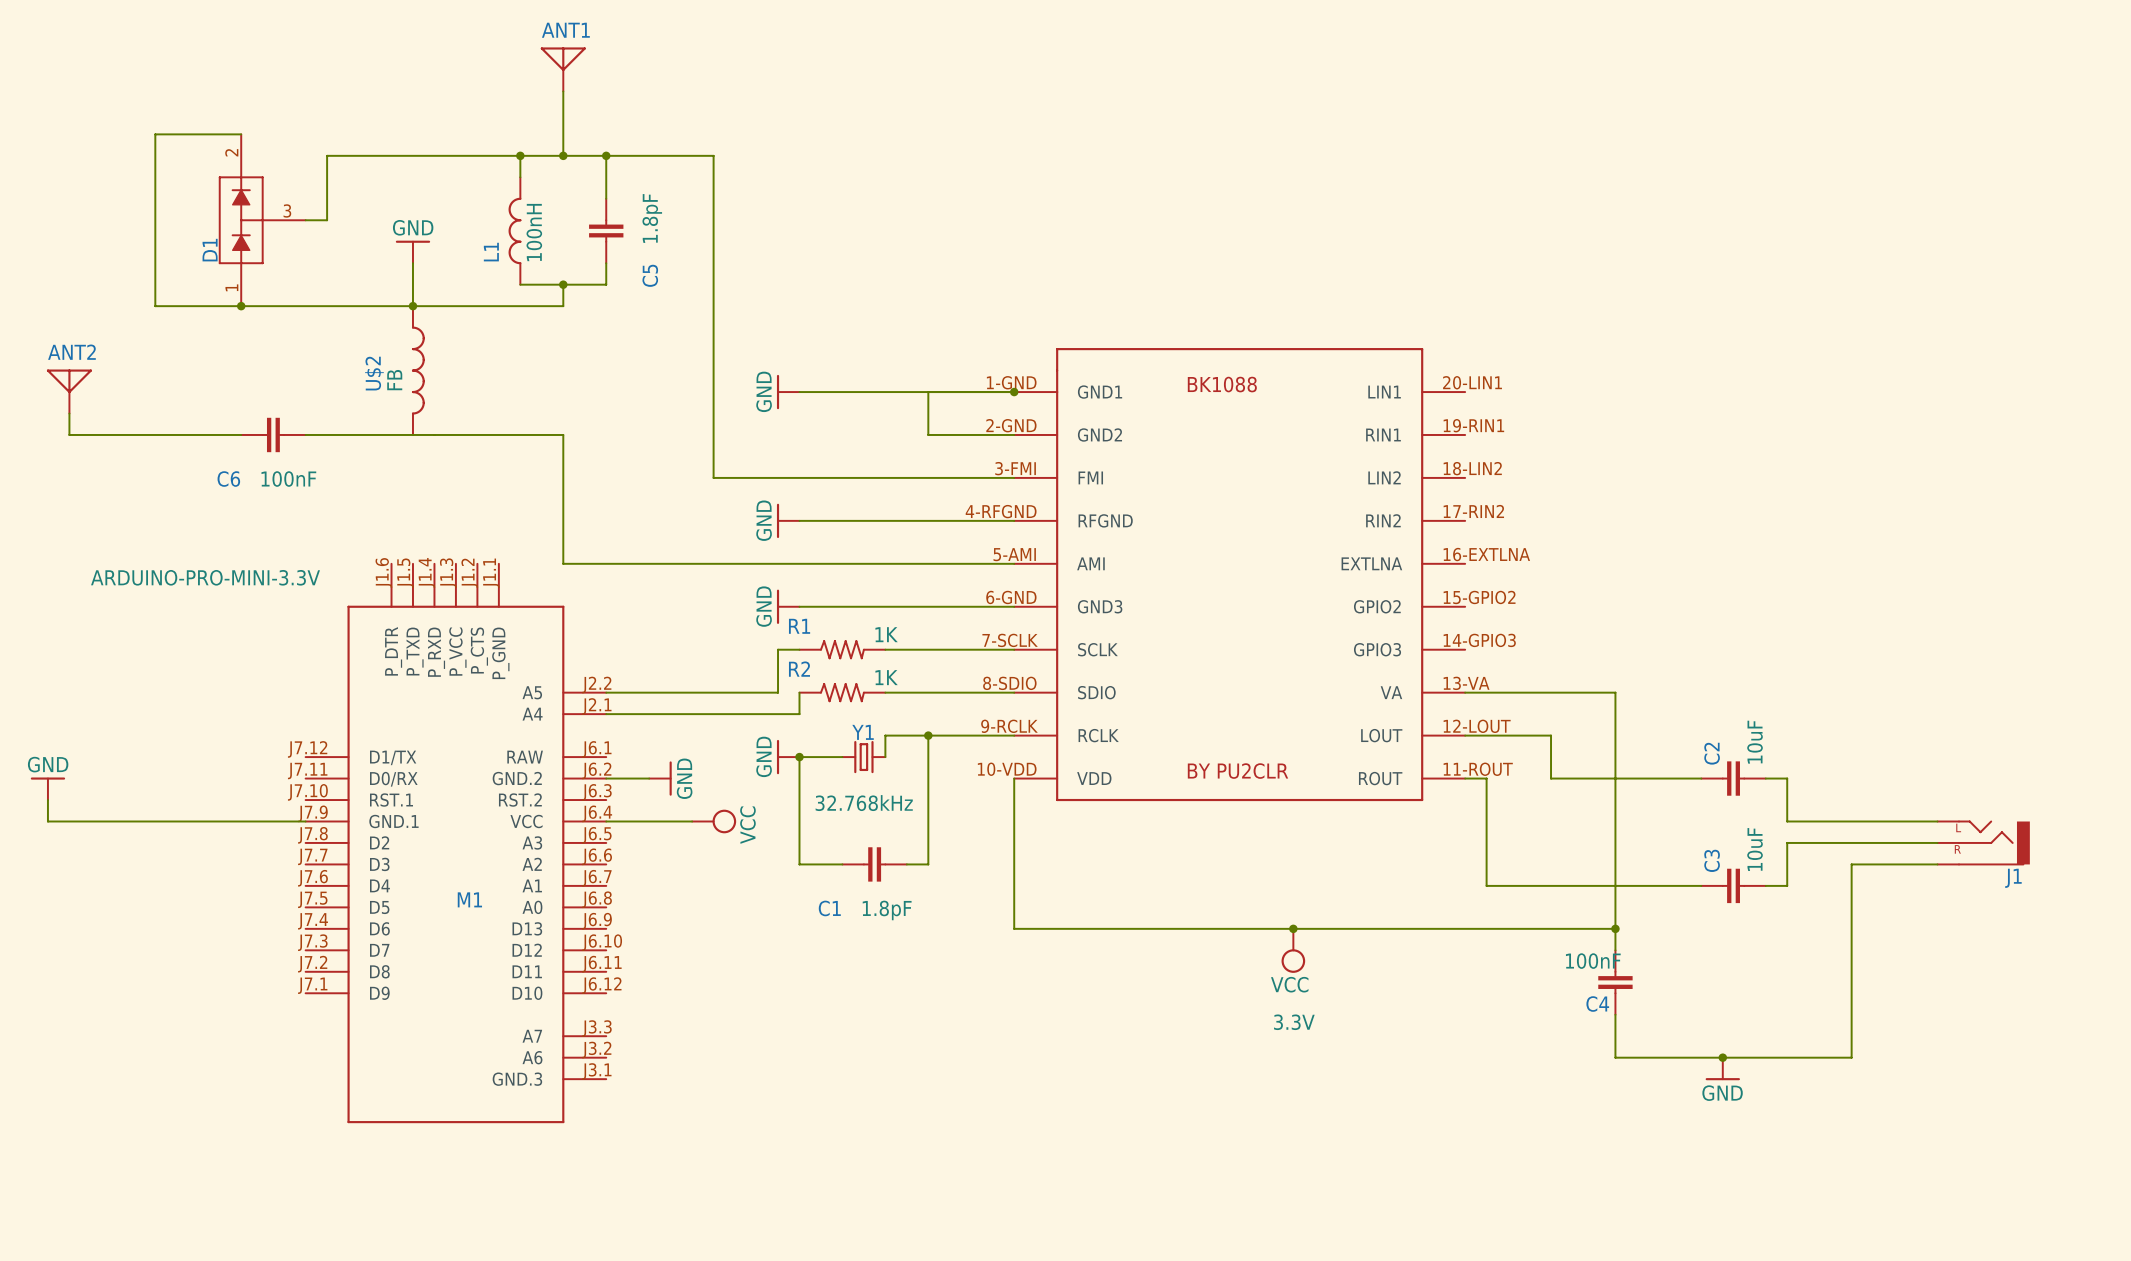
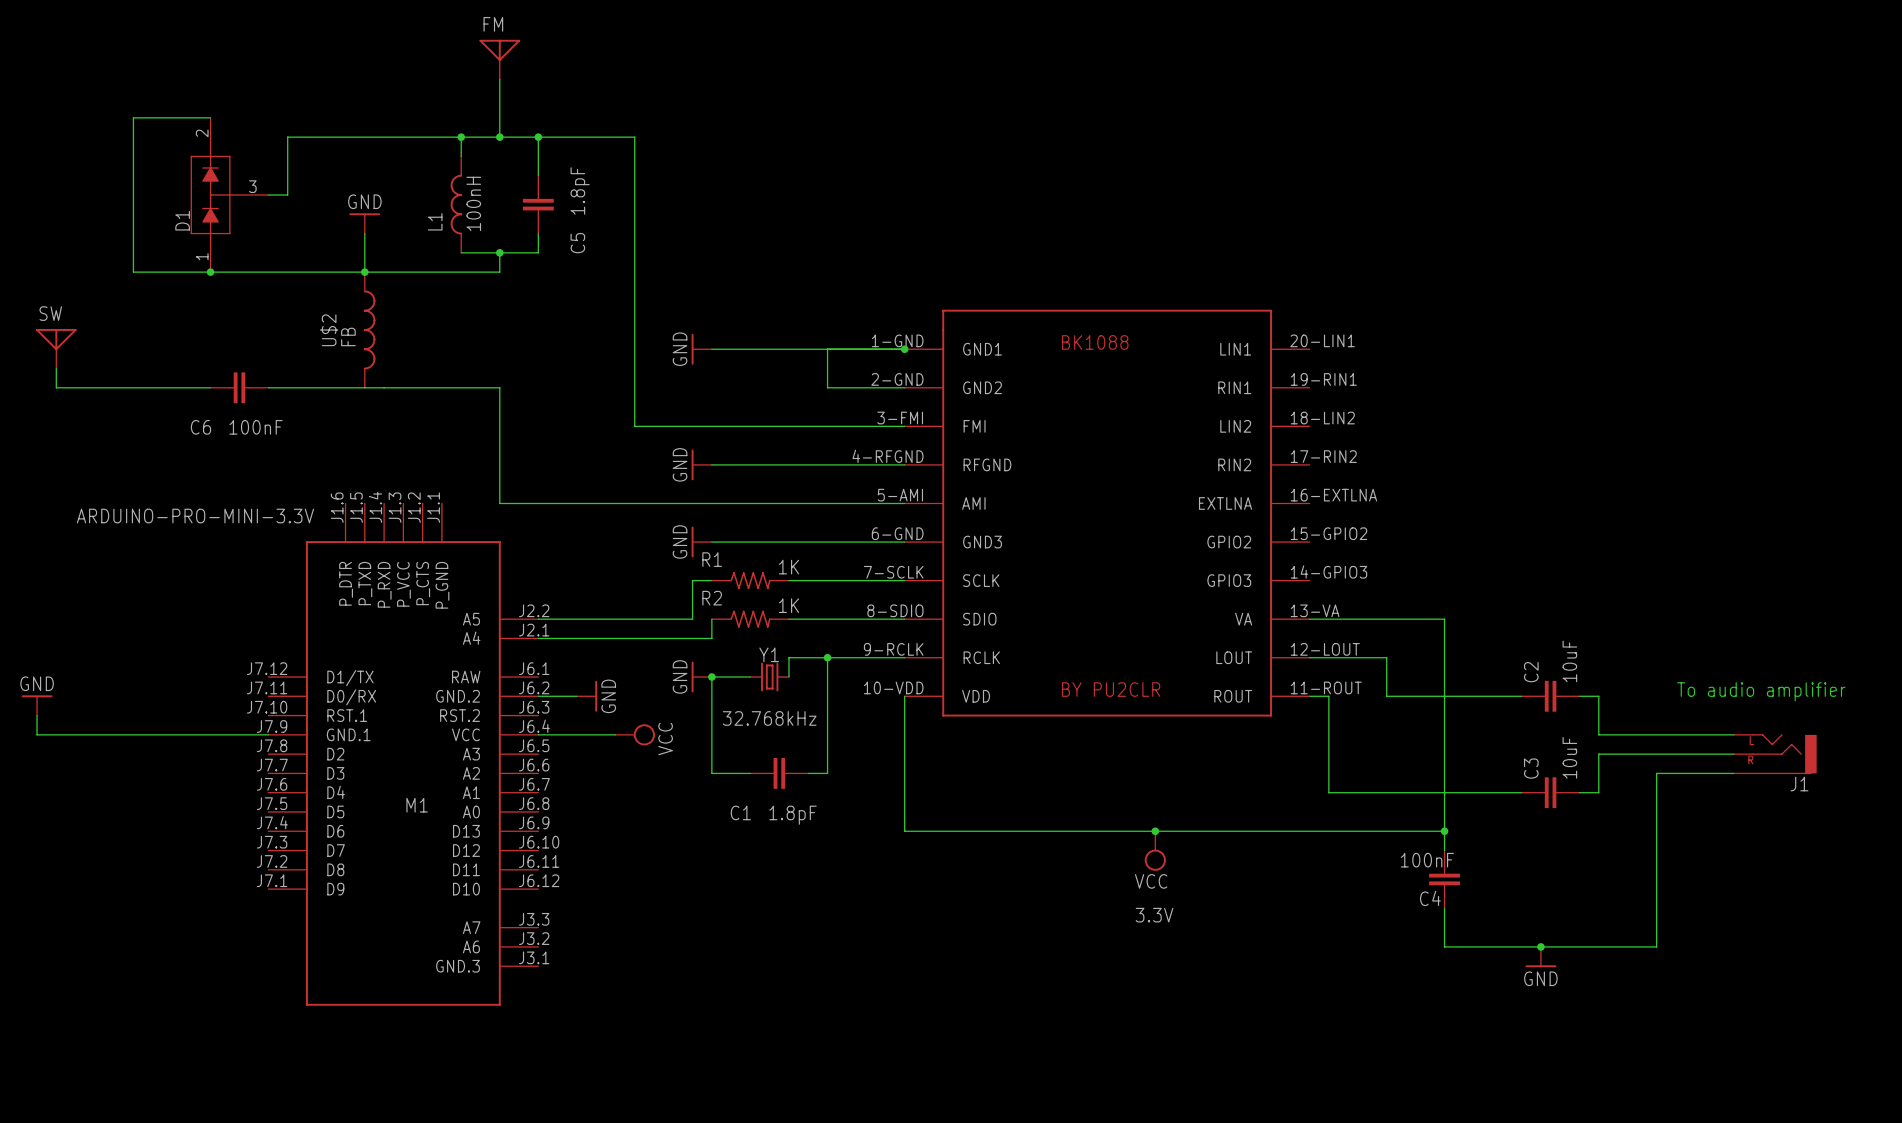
ANT1 name: ANT1 (565, 30) -> FM (493, 24)
ANT2 name: ANT2 (71, 352) -> SW (50, 313)
text: none -> To audio amplifier (1761, 691)

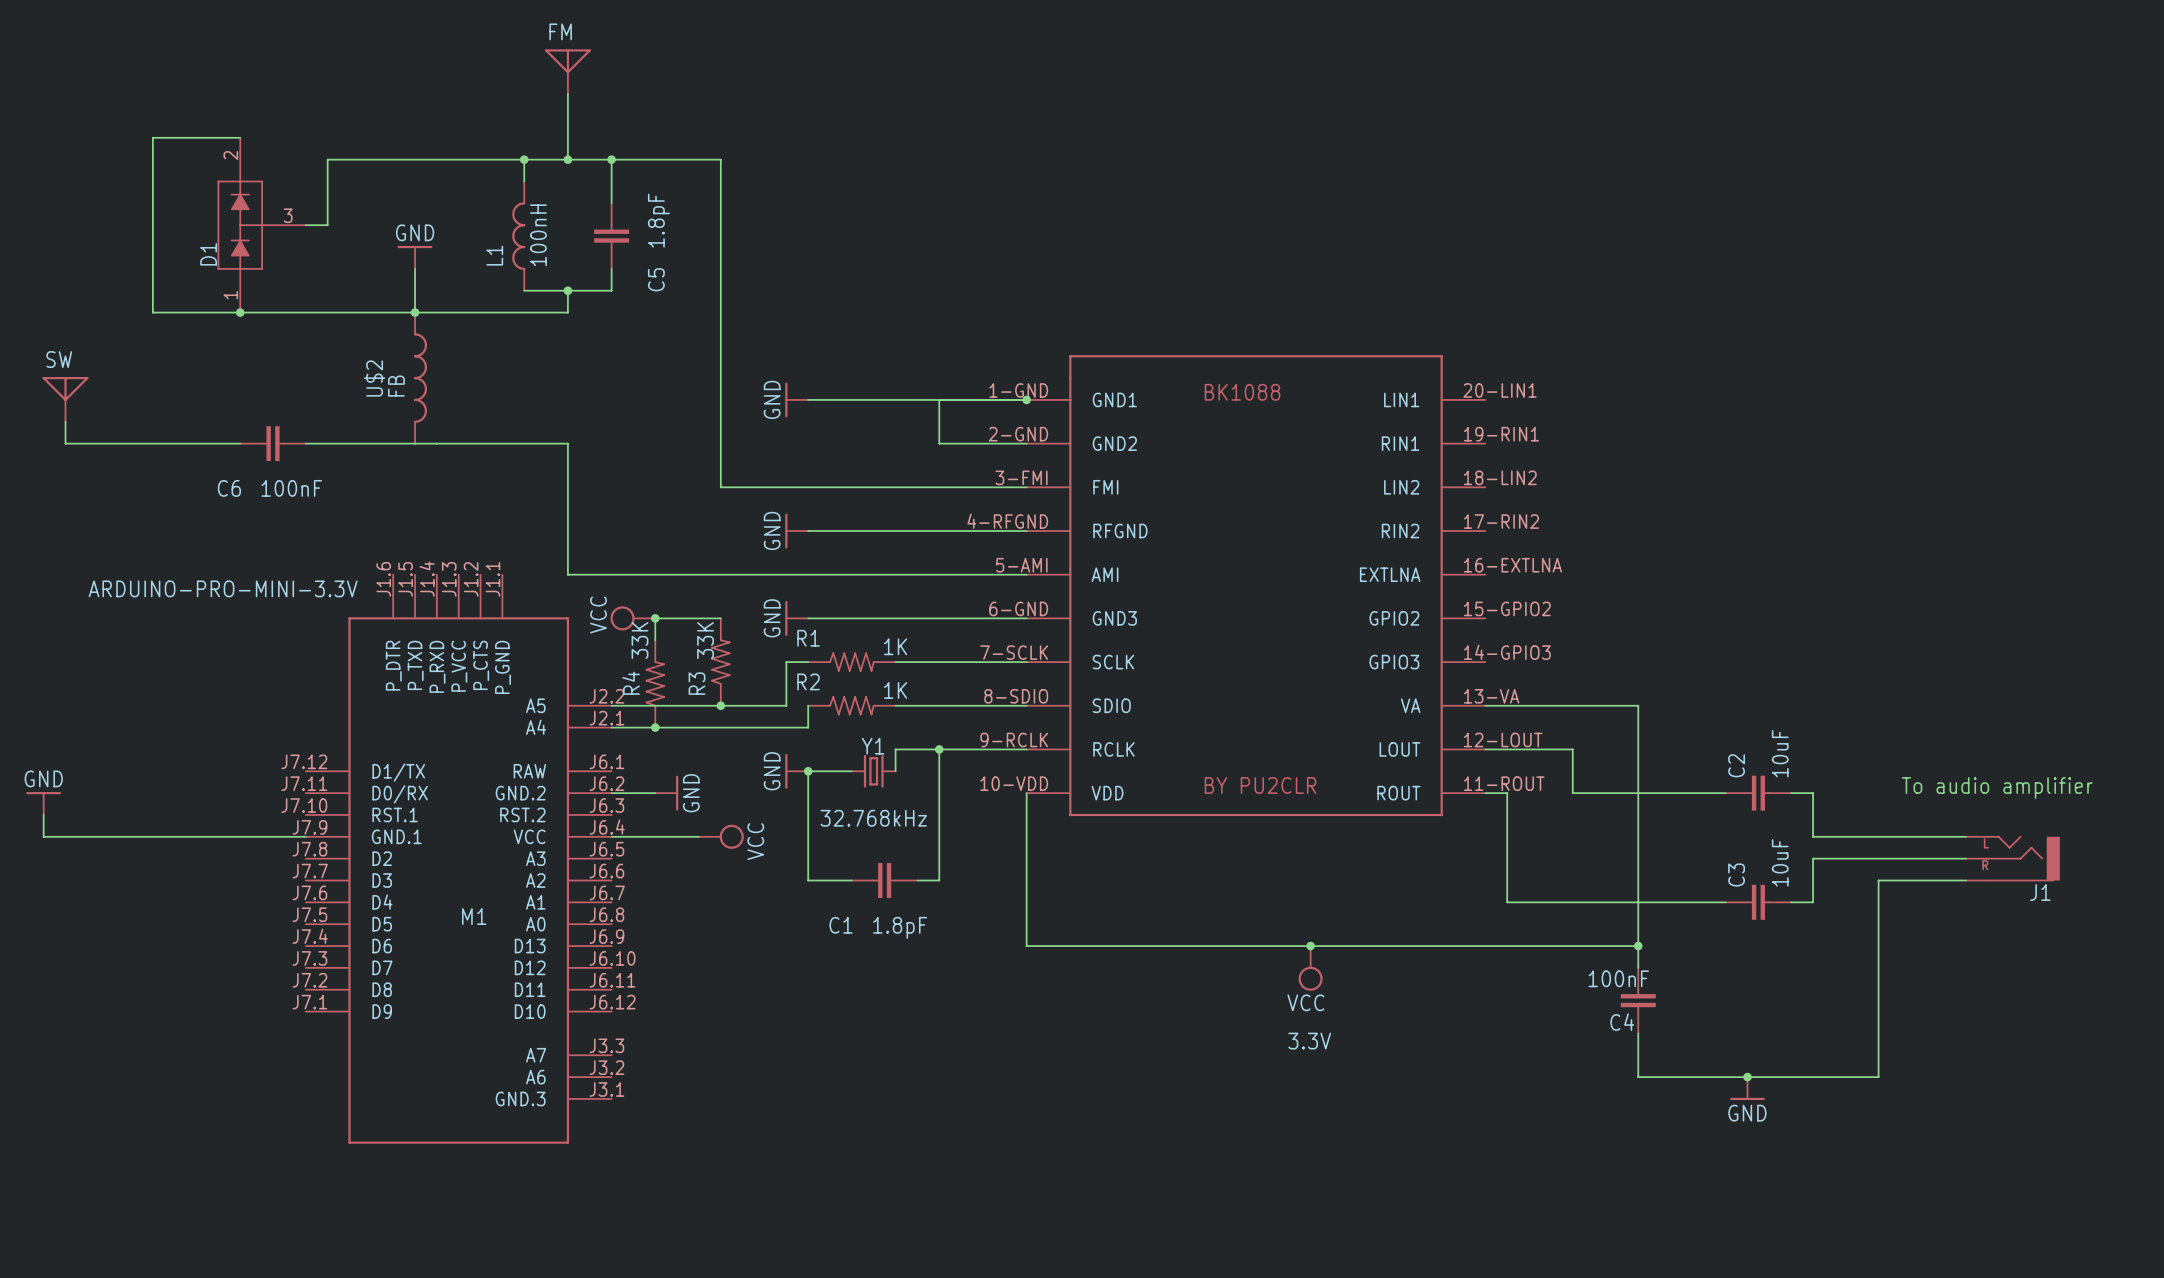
power symbol: none -> VCC (632, 618)
junction: none -> (655, 618)
wire: none -> (720, 618) (655, 618) (655, 640)
R3: none -> 33K (720, 662)
R4: none -> 33K (655, 683)
junction: none -> (720, 705)
junction: none -> (655, 727)

